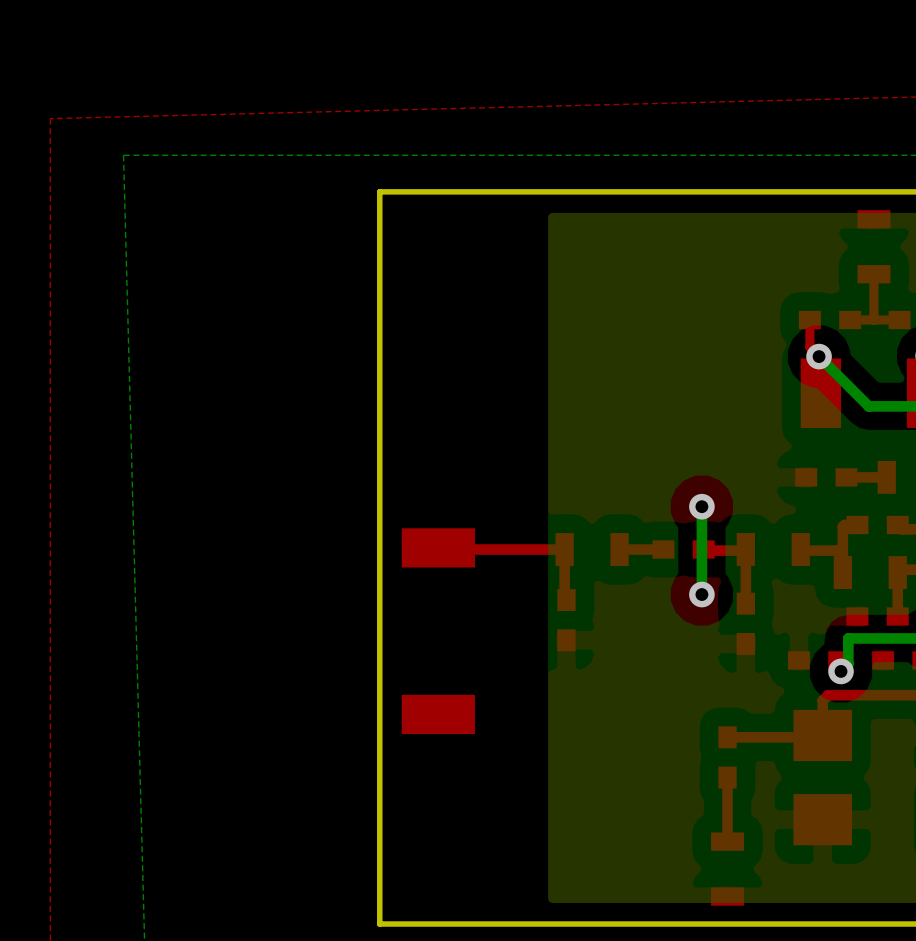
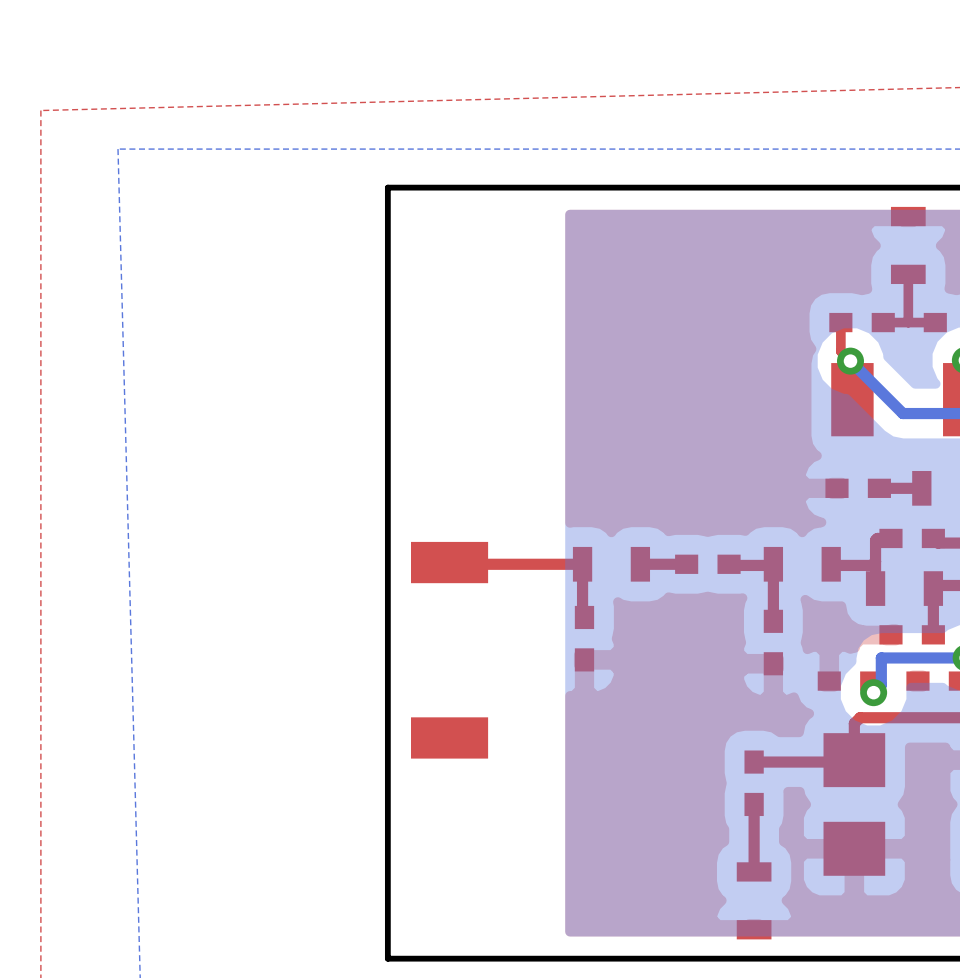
bottom track: (701, 506) (701, 594) -> none
via: (701, 506) -> none
via: (701, 594) -> none

